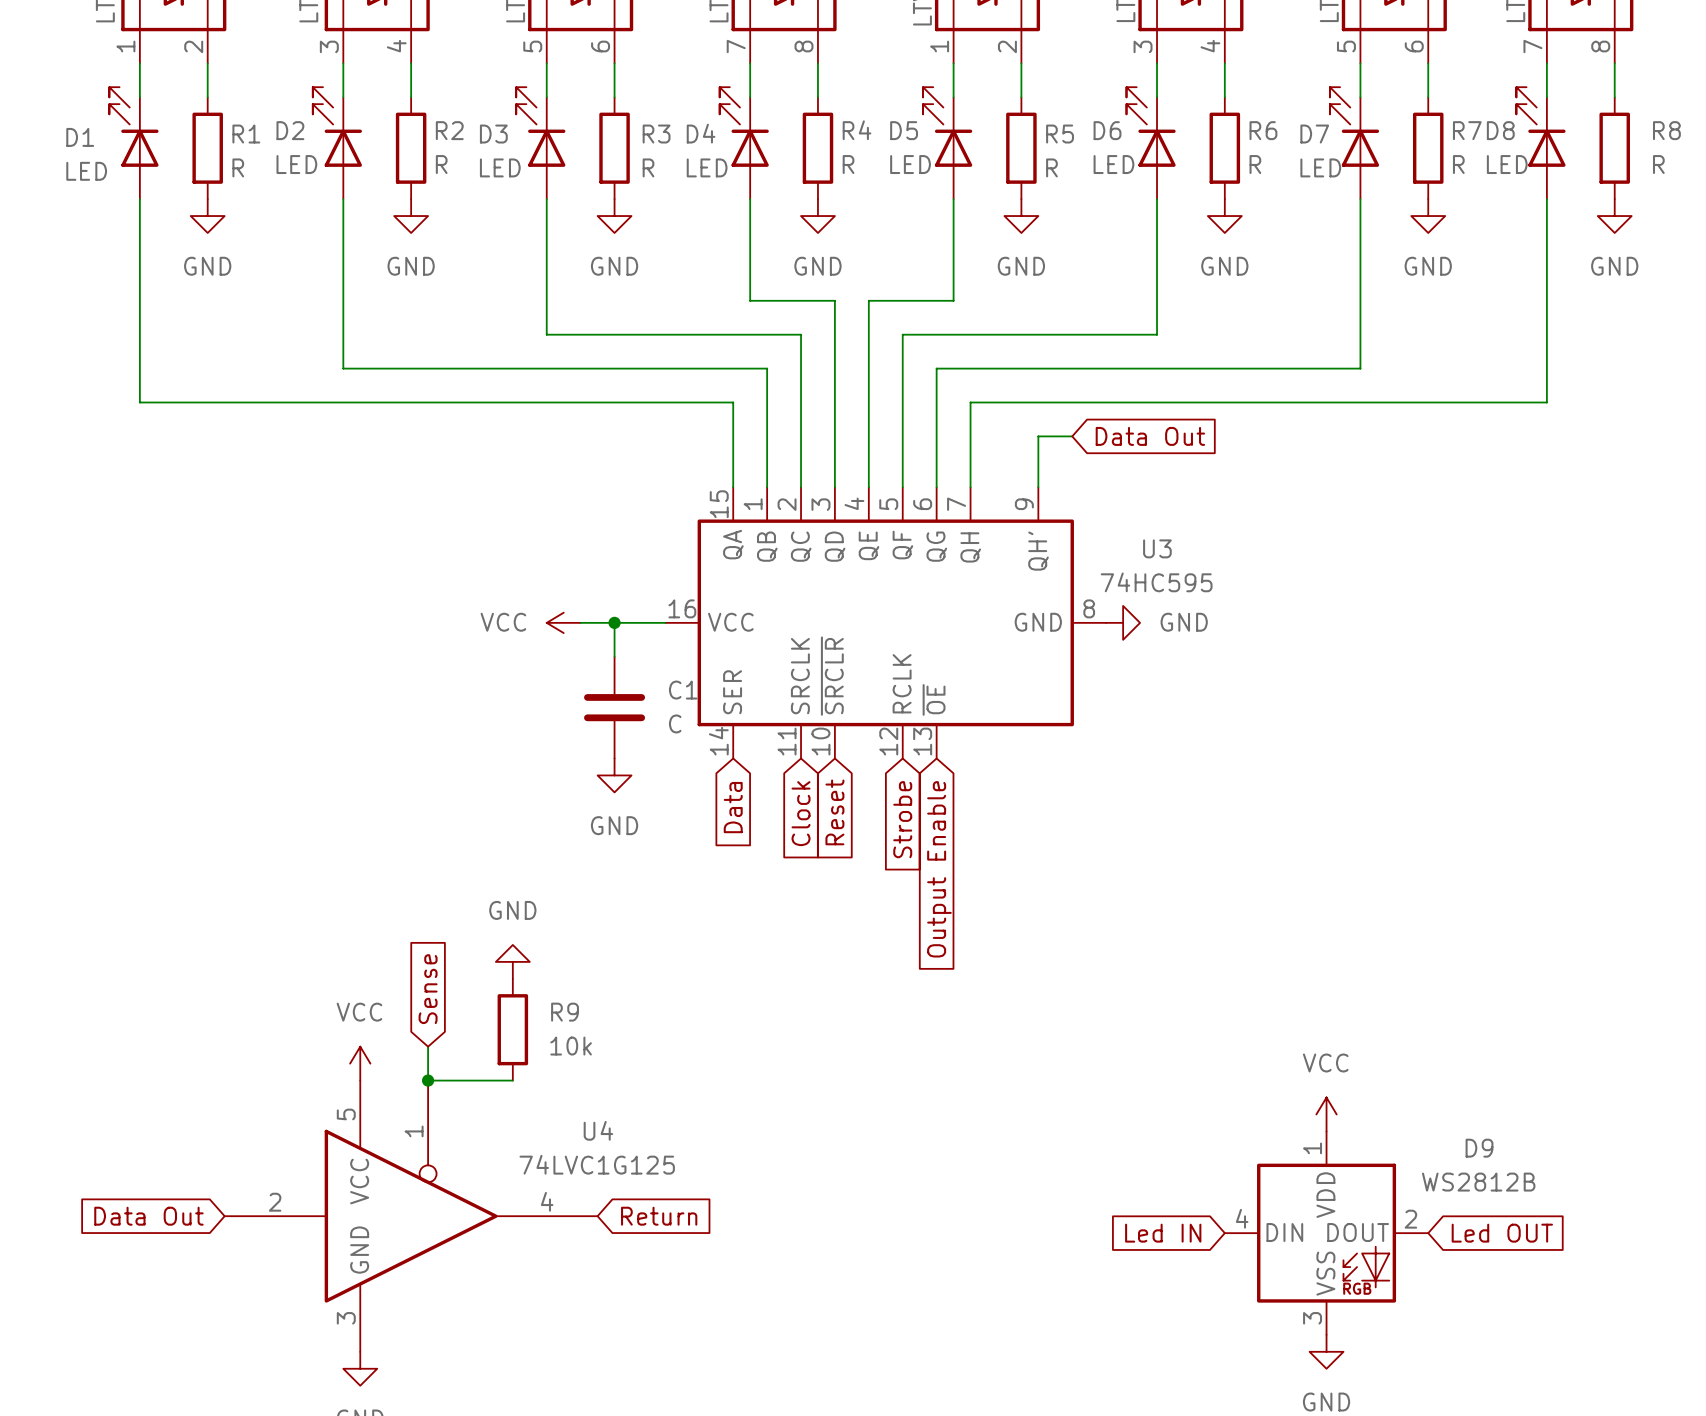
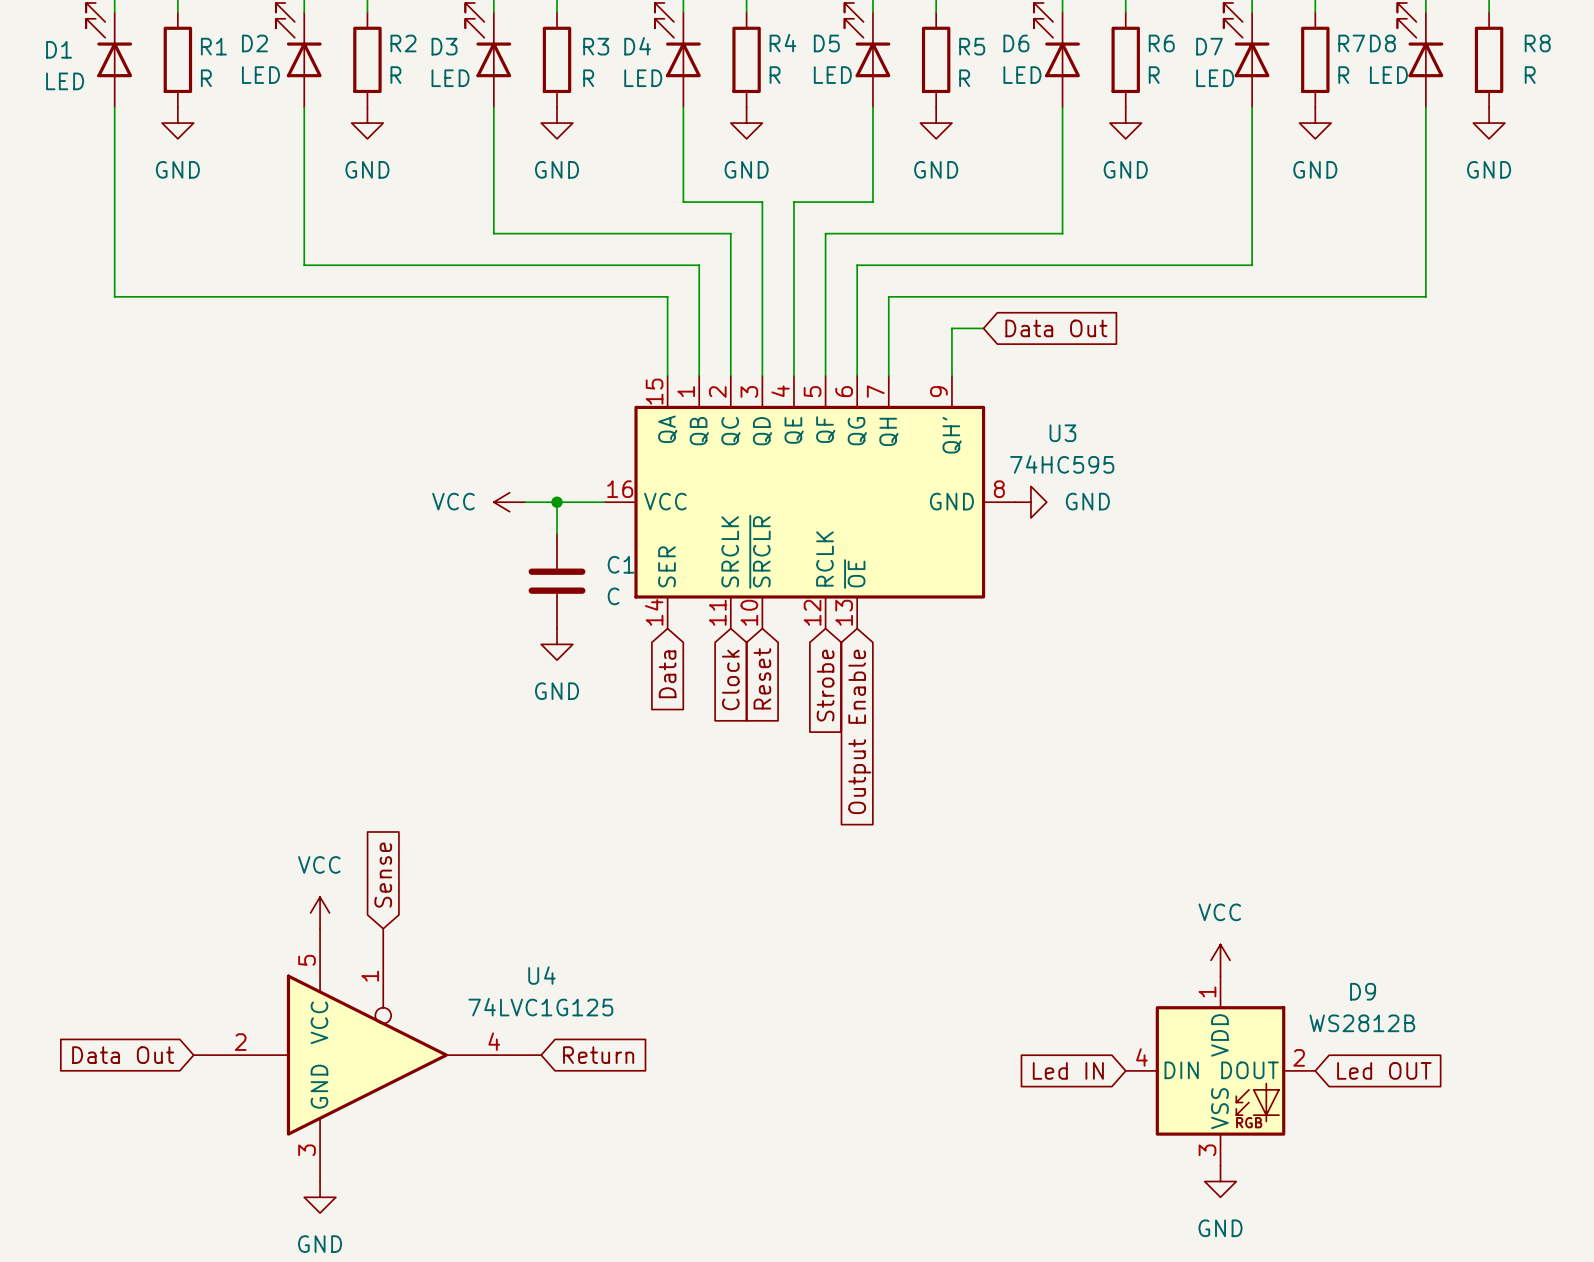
power symbol: GND (512, 961) -> none
global label position: Sense (428, 989) -> Sense (383, 875)
R9: 10k (512, 1029) -> none
wire: (428, 1046) (428, 1080) (512, 1080) -> none
junction: (428, 1080) -> none

